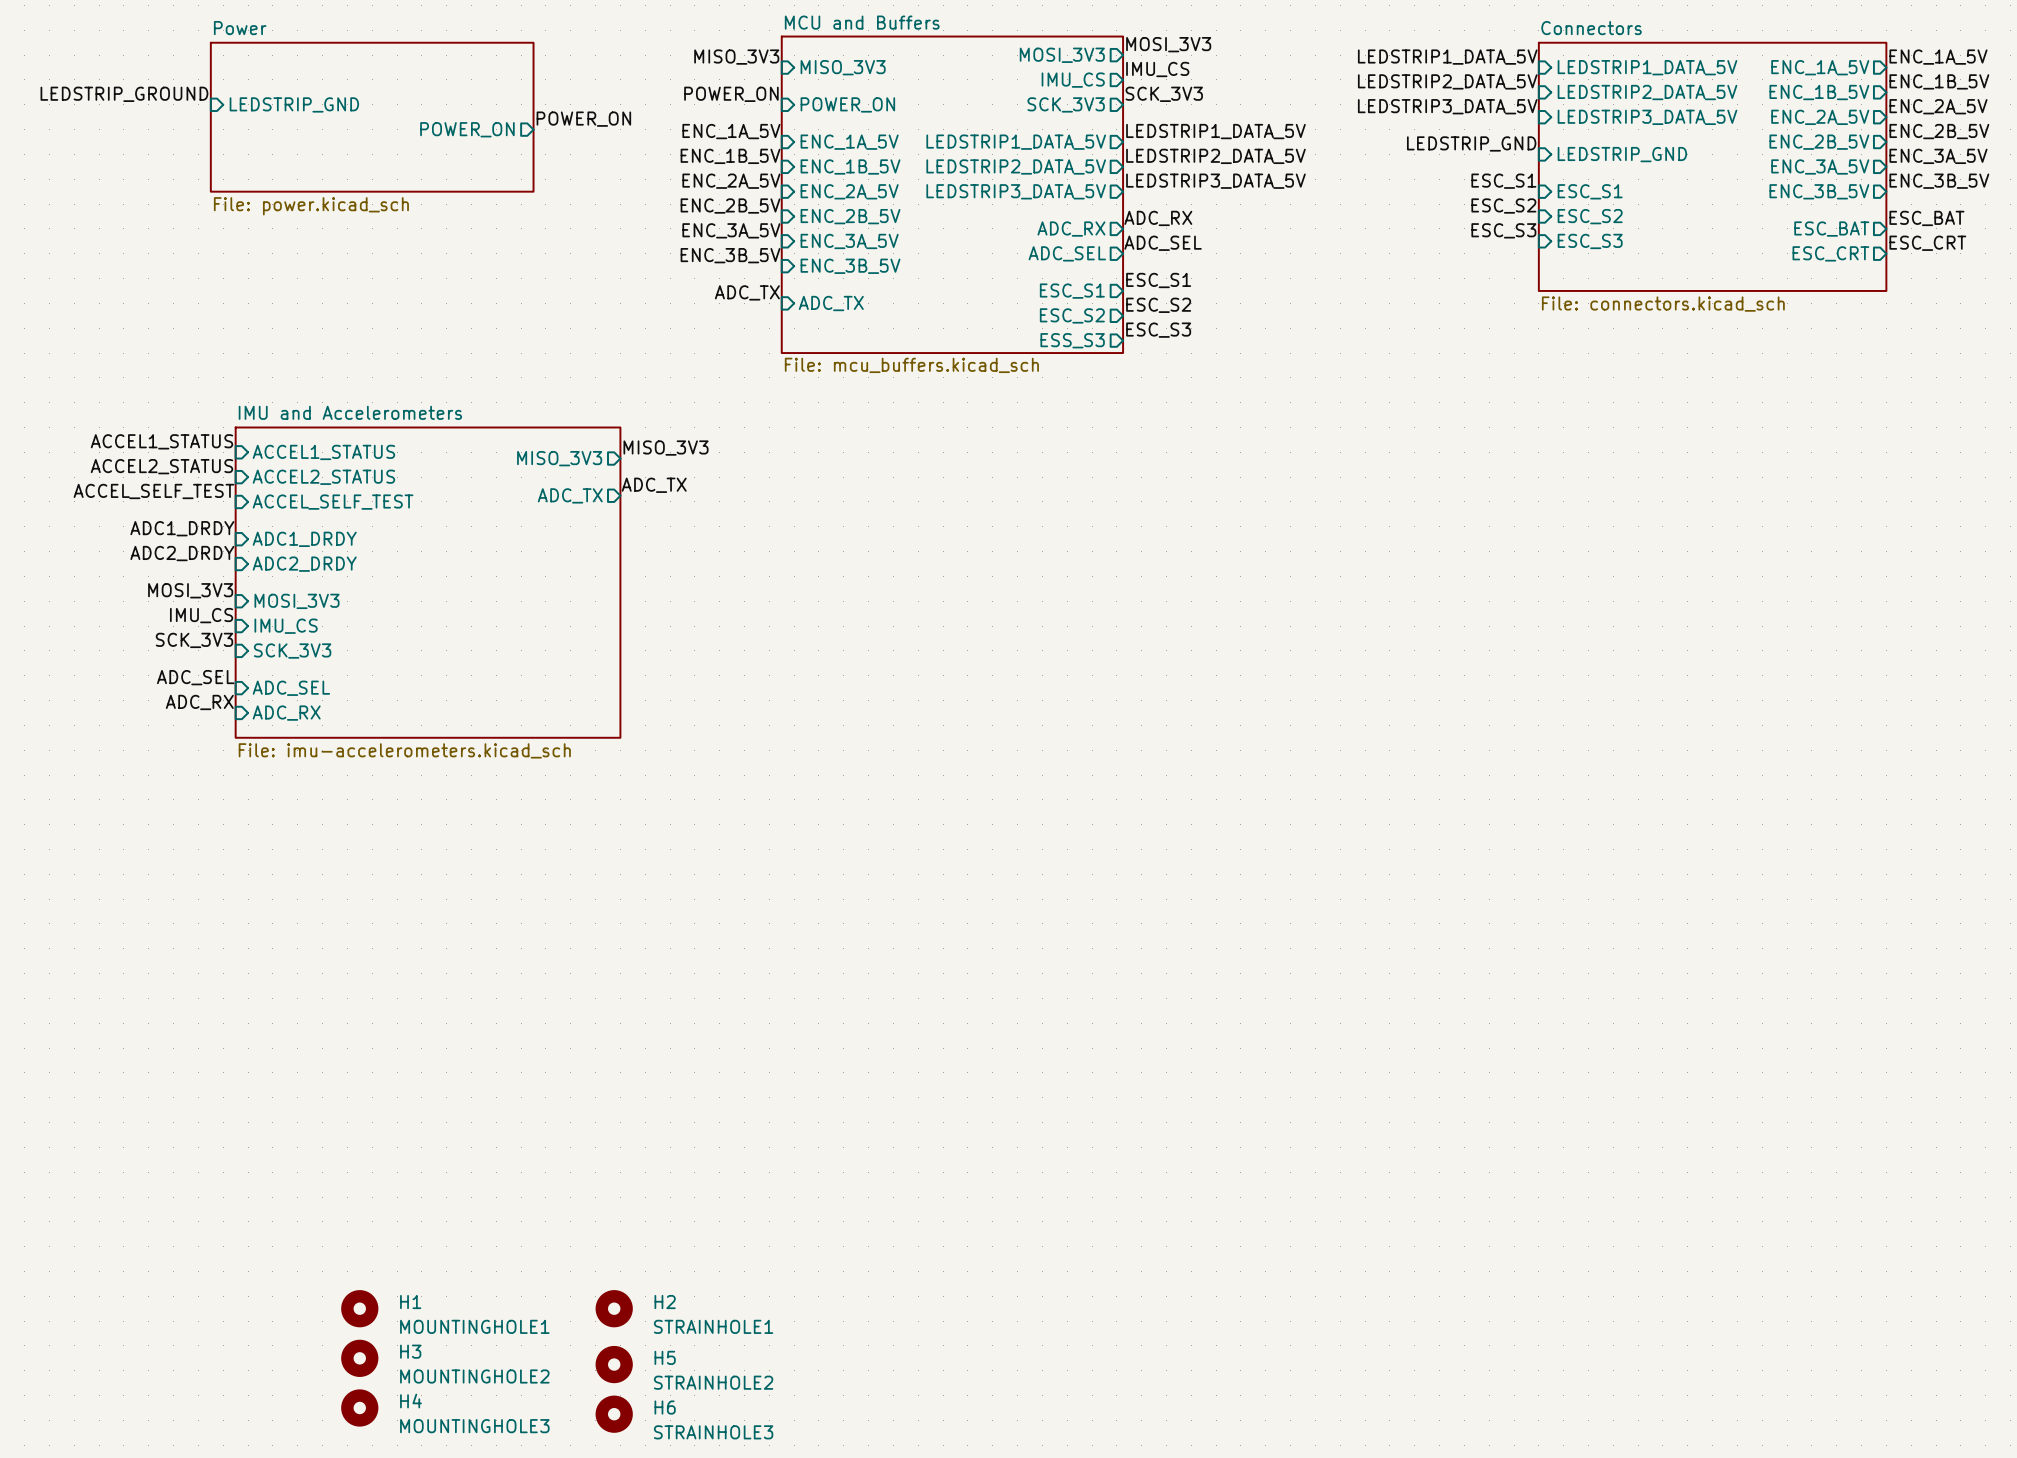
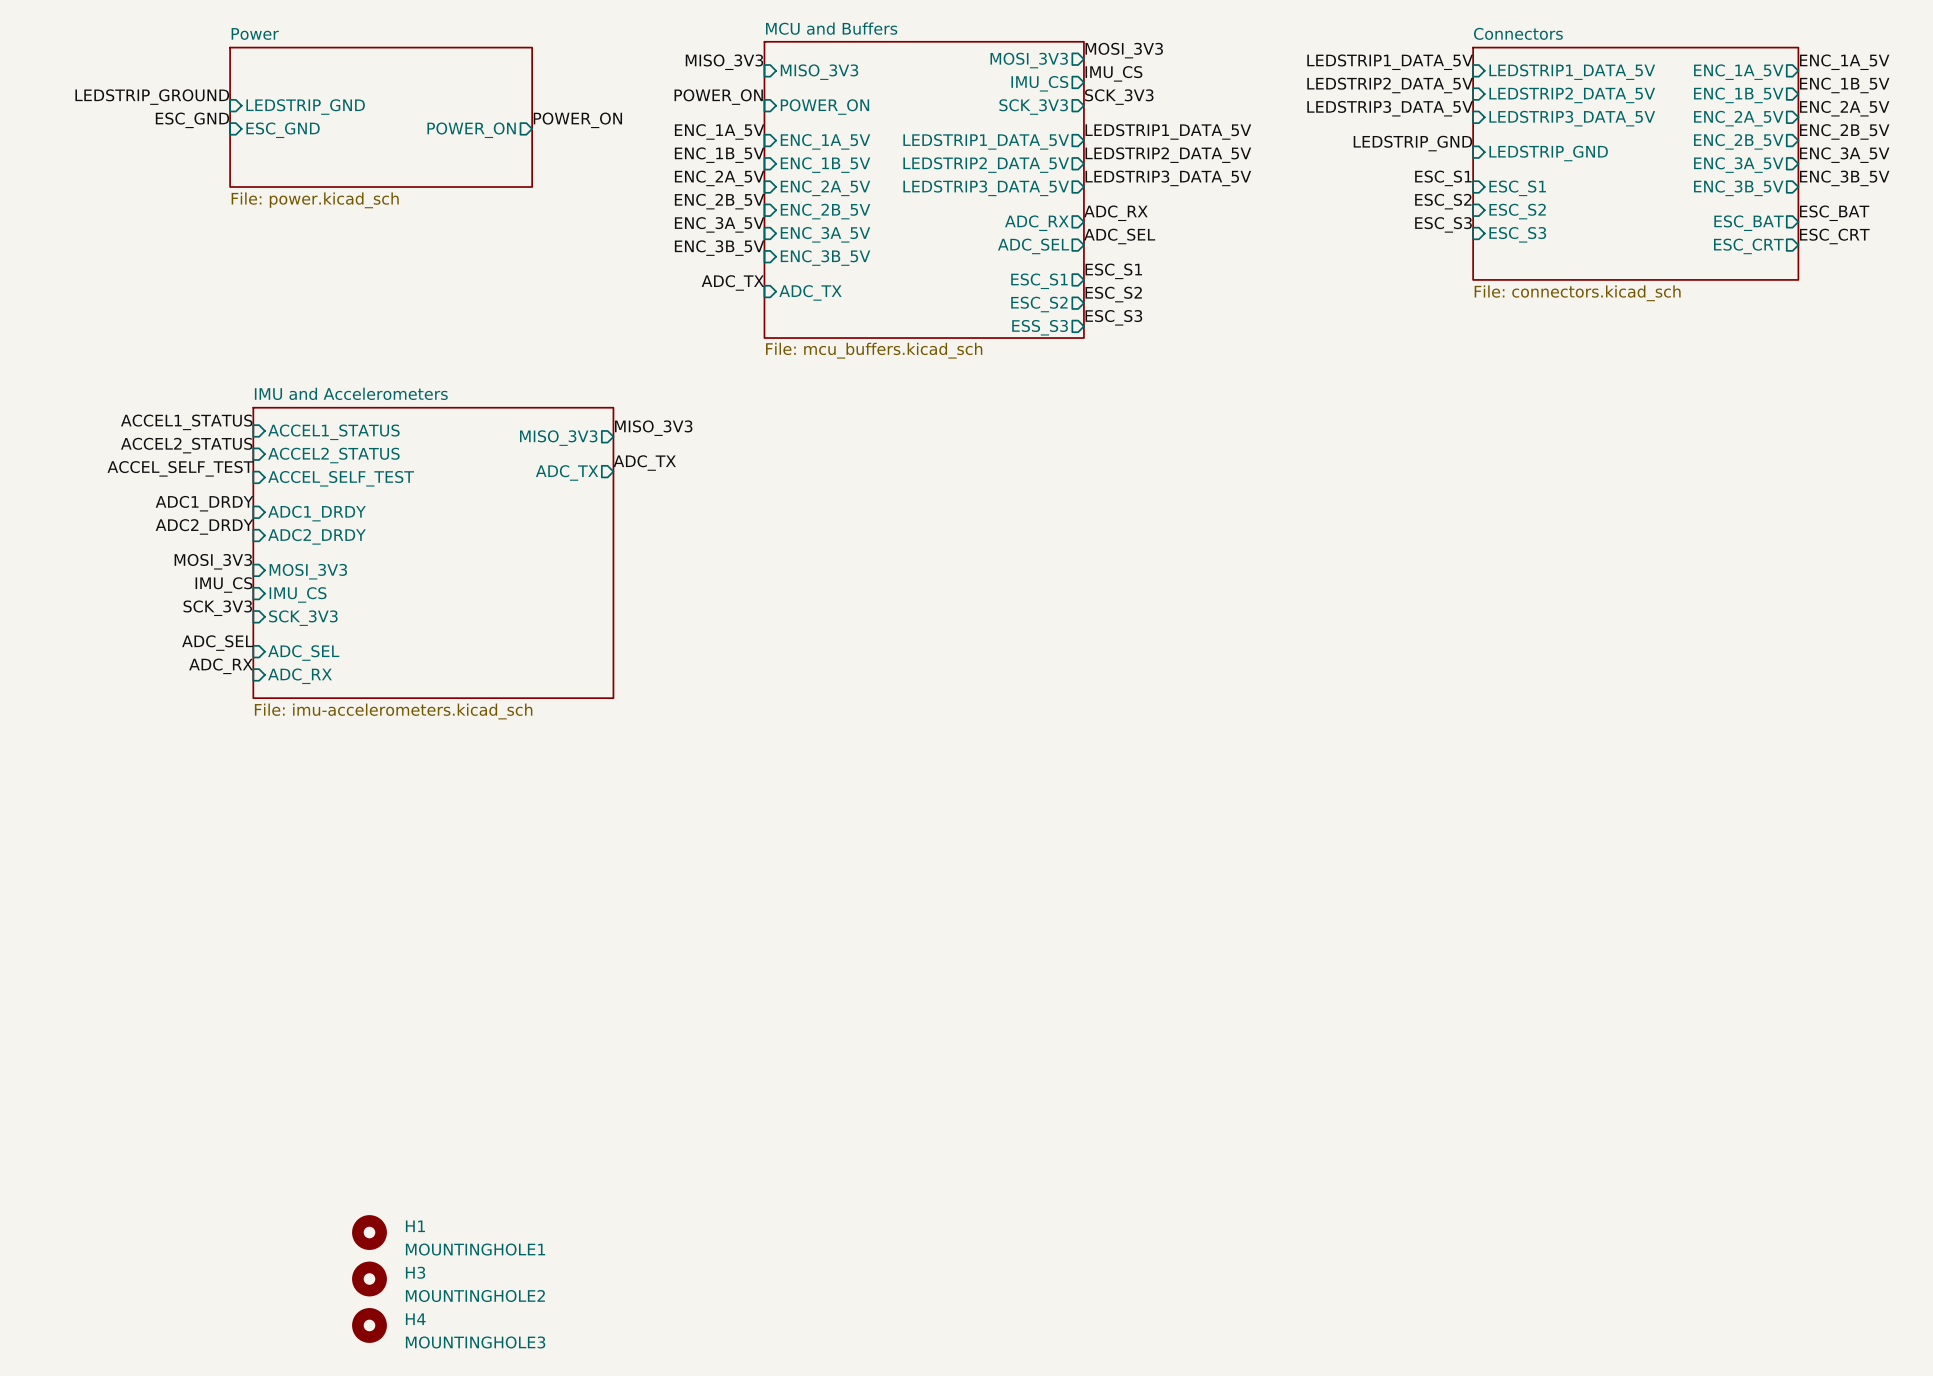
label: none -> ESC_GND (192, 120)
sheet pin: none -> ESC_GND (283, 130)
H2: STRAINHOLE1 (614, 1308) -> none
H5: STRAINHOLE2 (614, 1364) -> none
H6: STRAINHOLE3 (614, 1414) -> none

